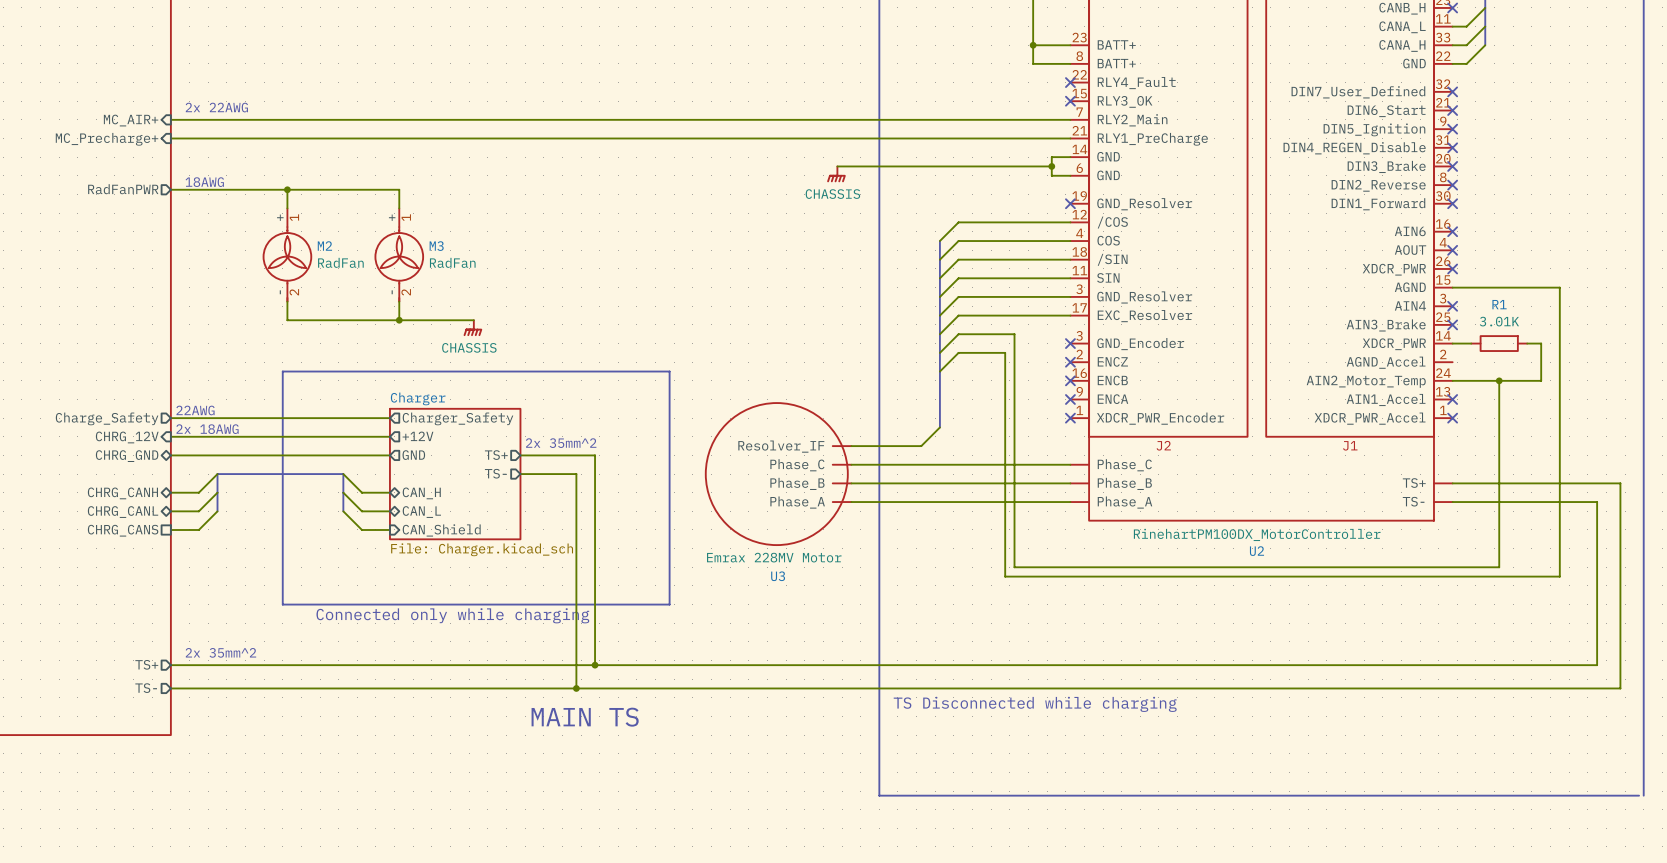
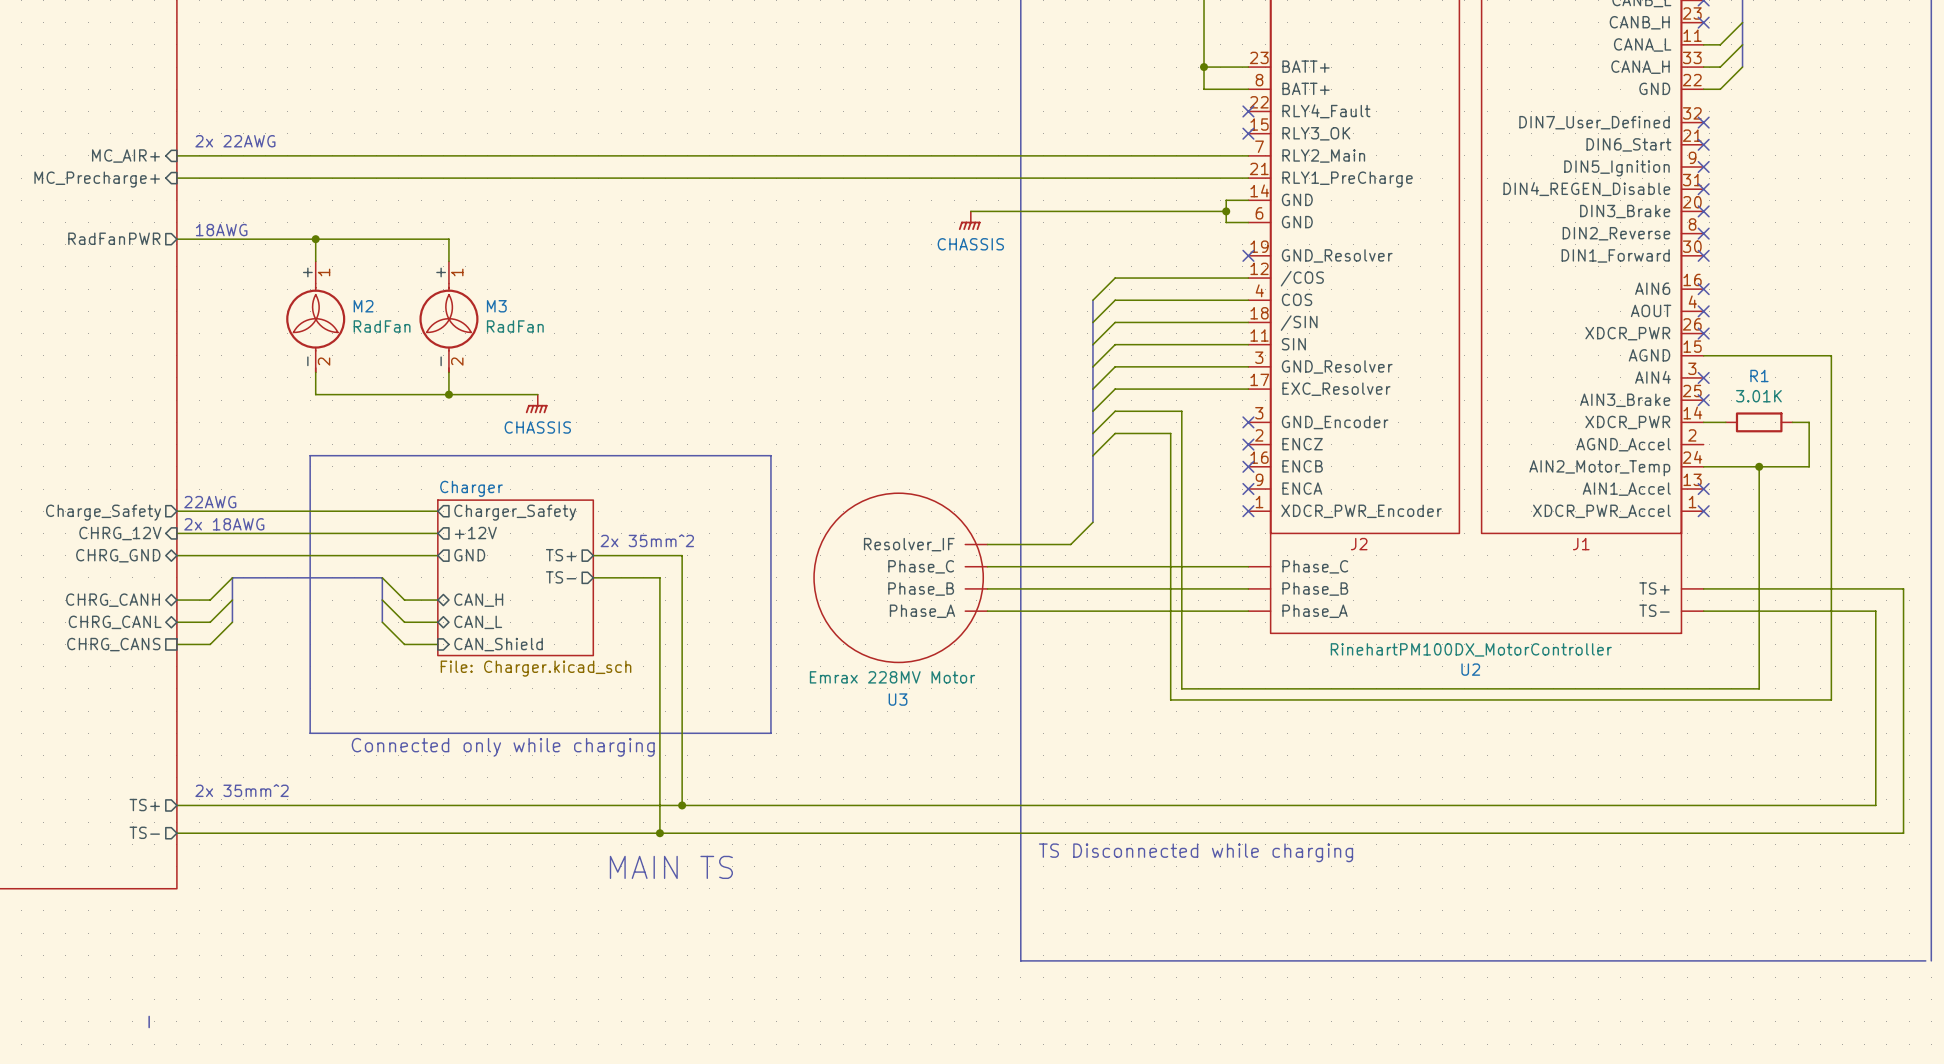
part: CHASSIS (836, 173) -> none
CHASSIS: none -> (969, 220)
part: CHASSIS (472, 327) -> none
CHASSIS: none -> (536, 403)
line: none -> (149, 1016) (149, 1027)

